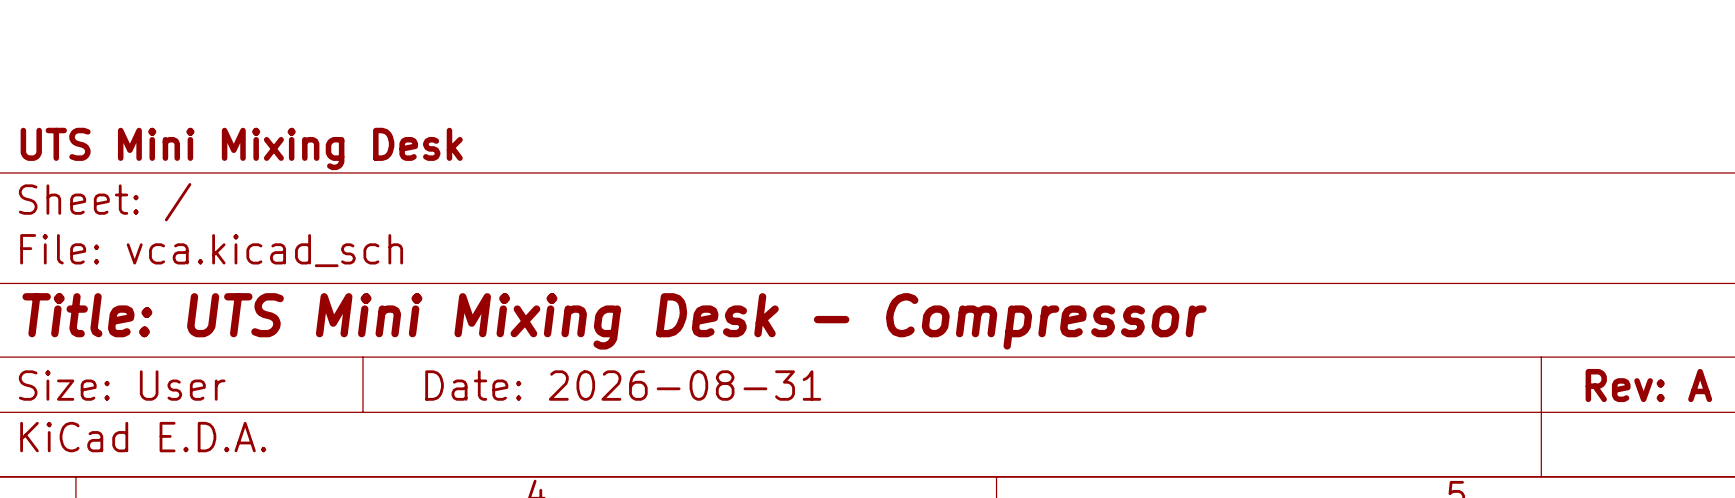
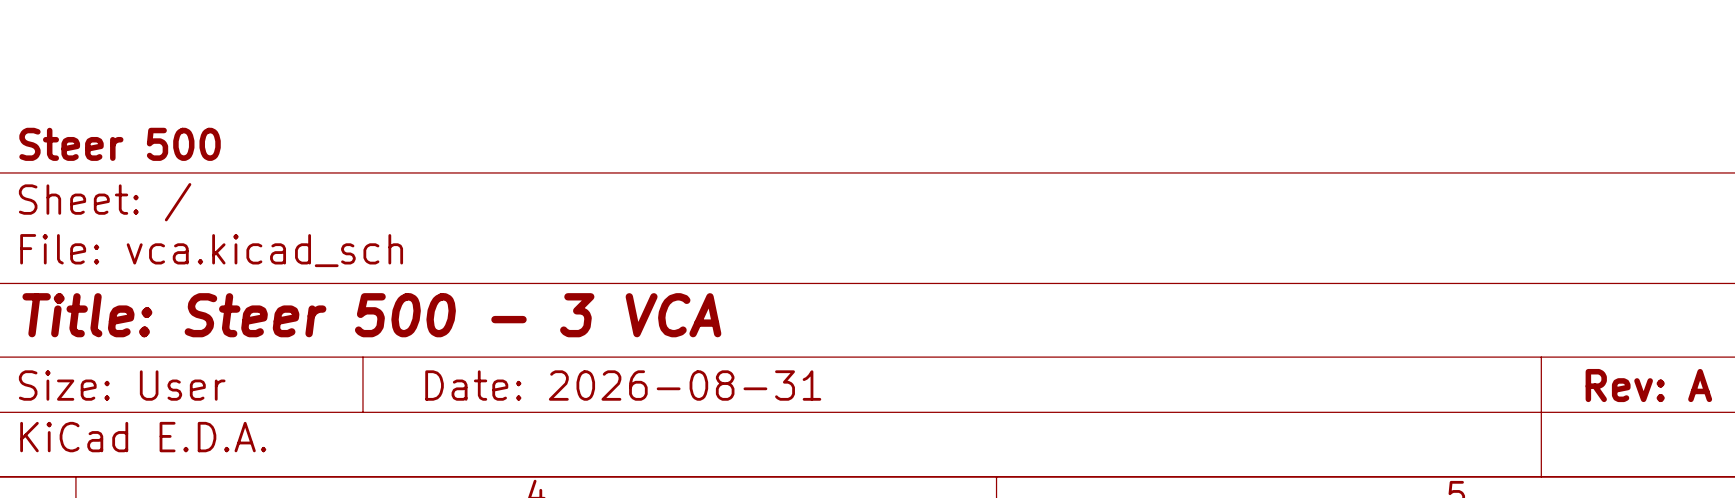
title block: UTS Mini Mixing Desk (241, 148) -> Steer 500 (120, 144)
title block: Title: UTS Mini Mixing Desk - Compressor (614, 321) -> Title: Steer 500 - 3 VCA (371, 315)

